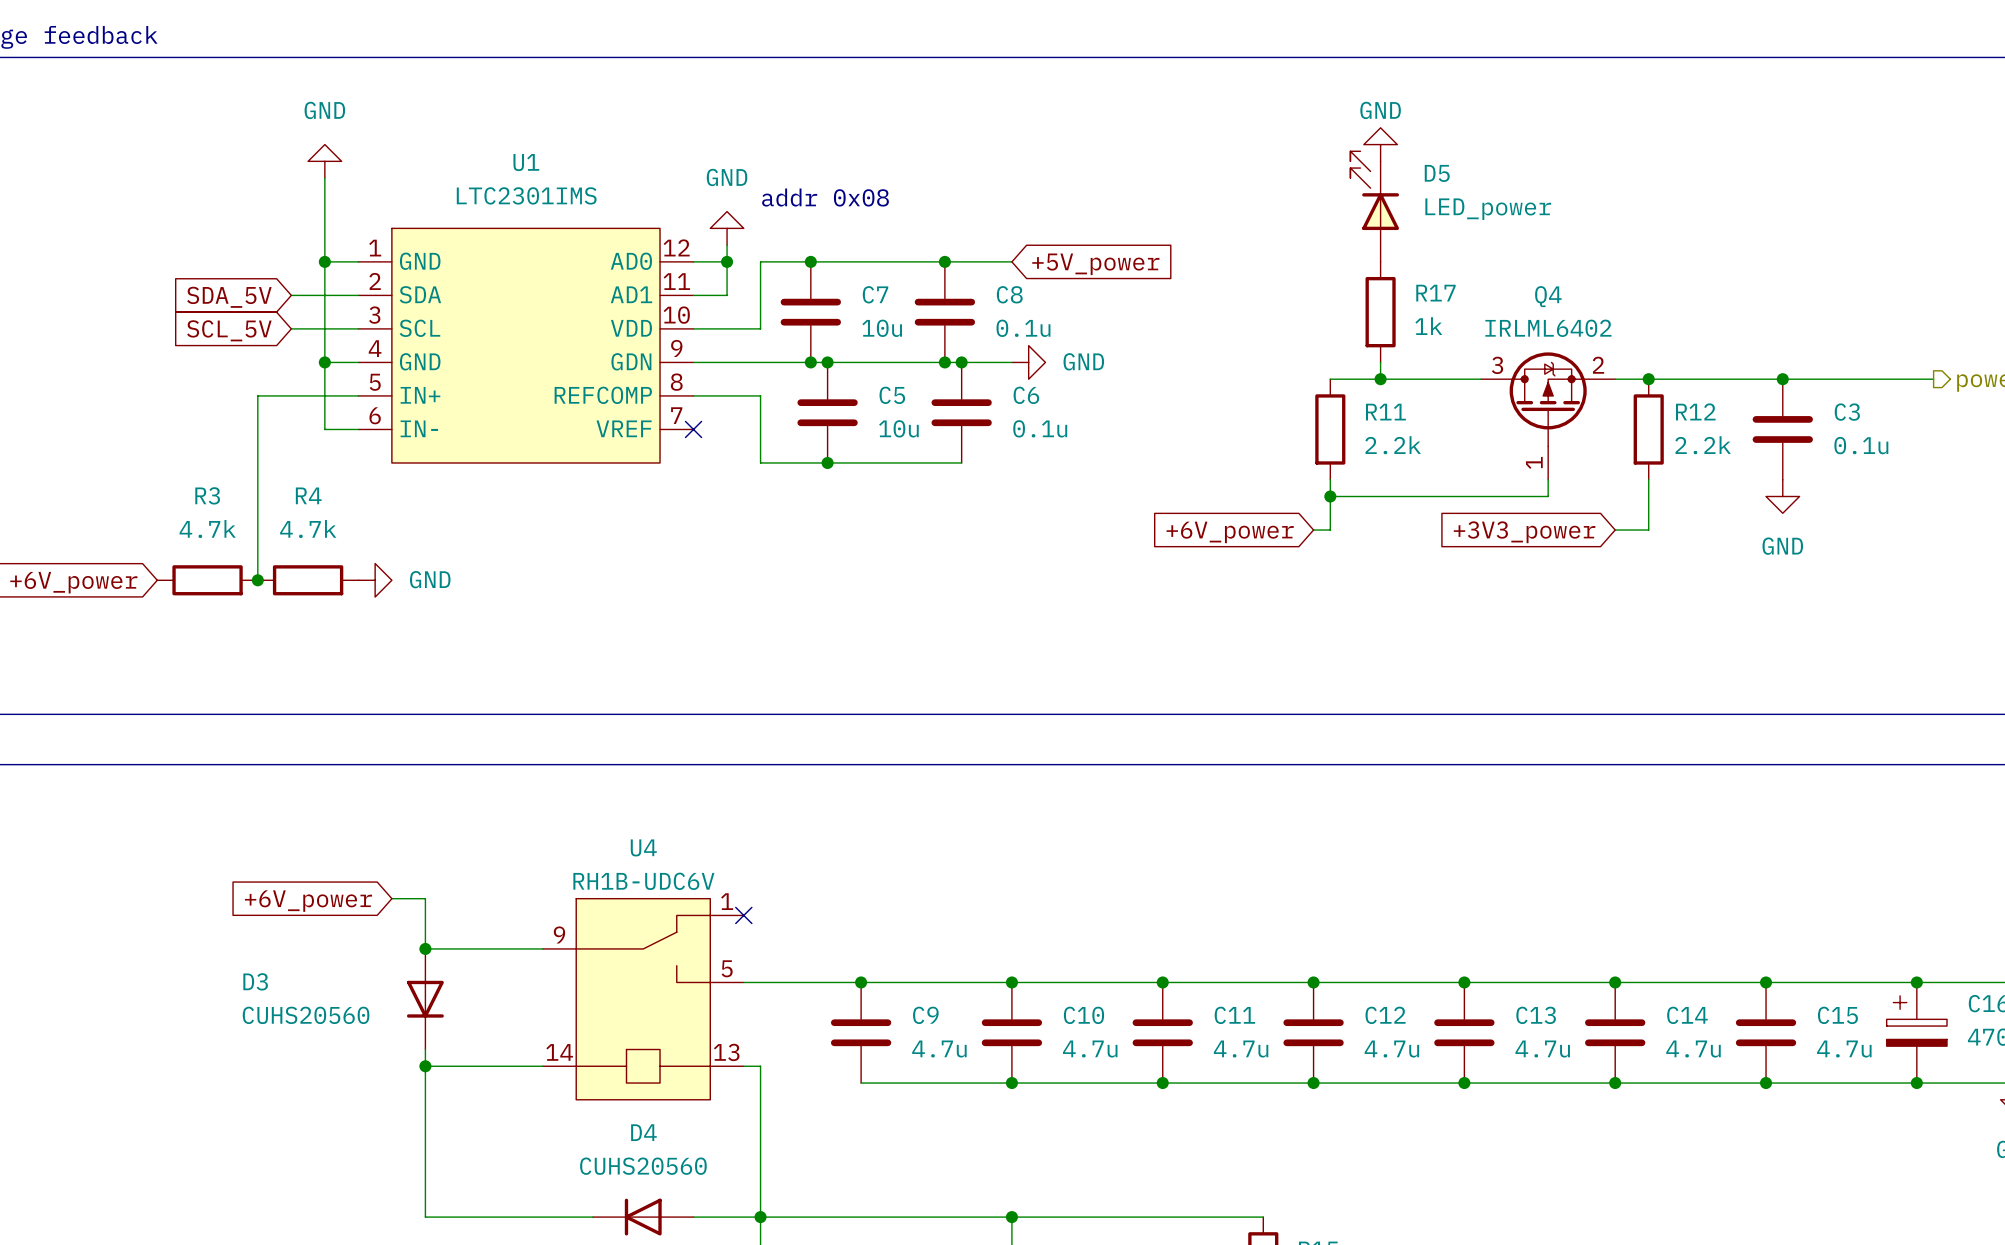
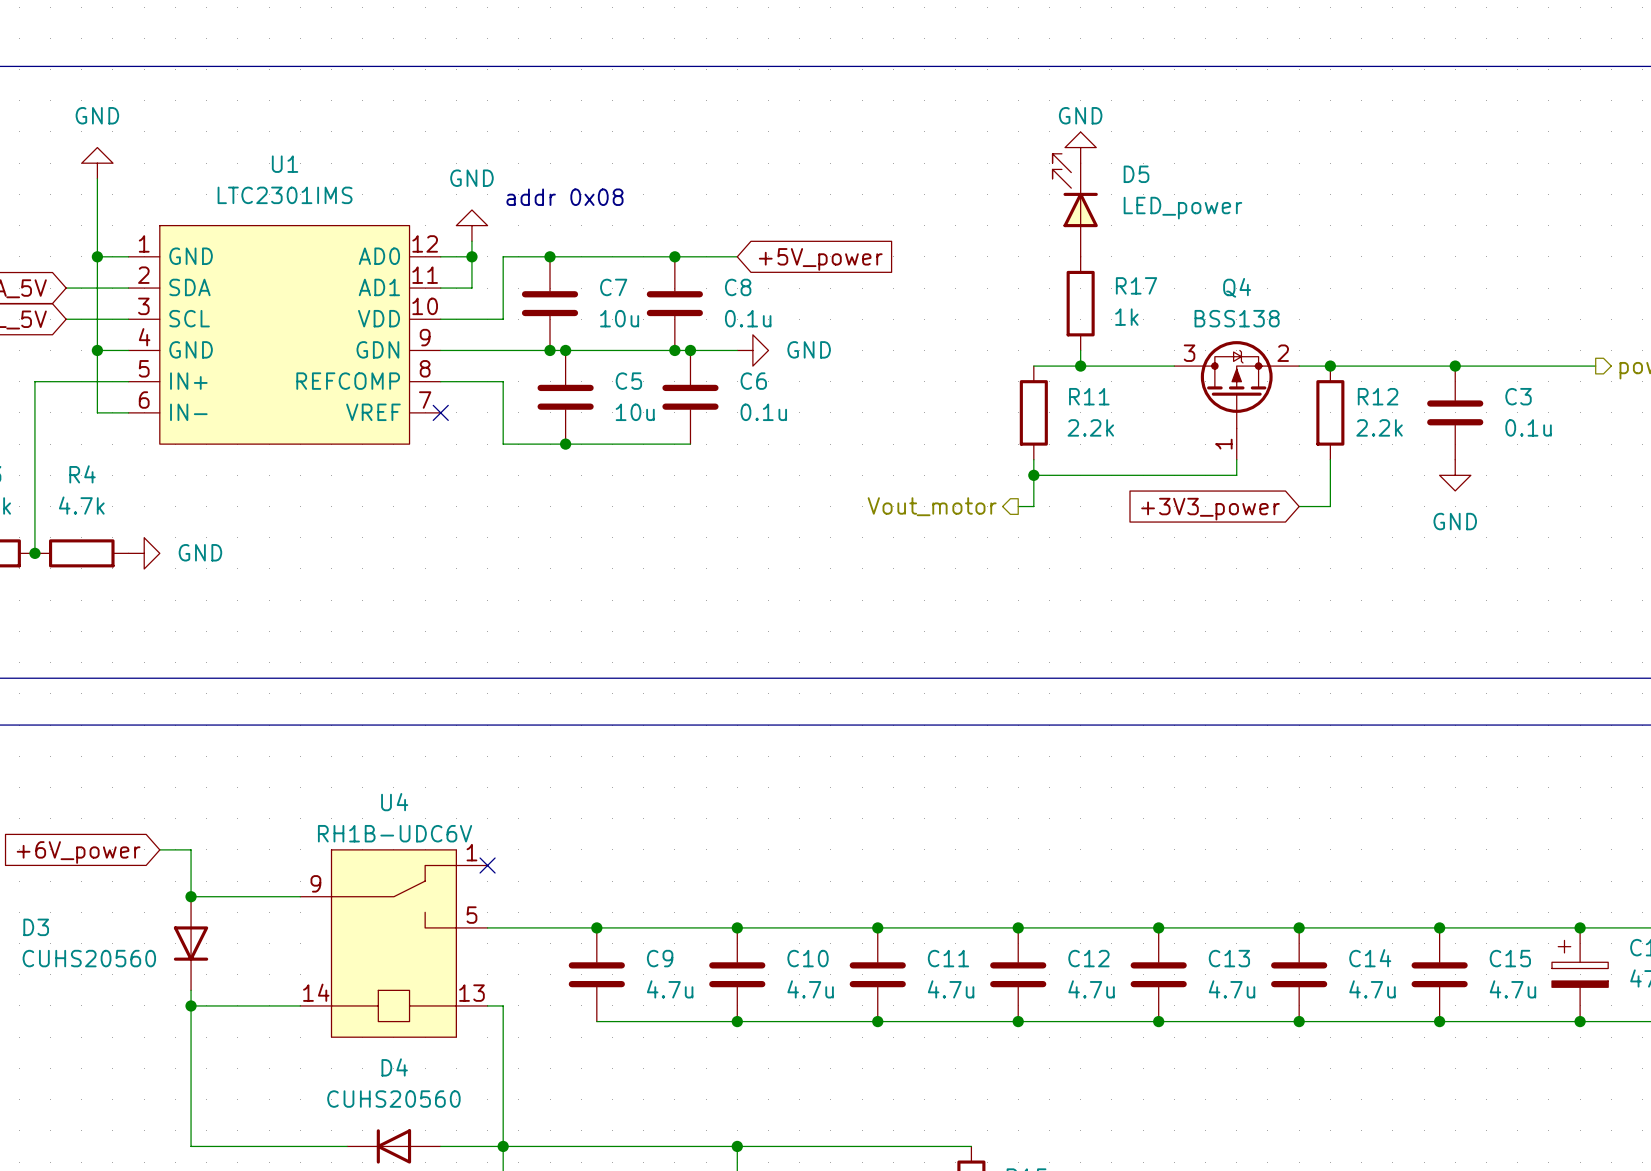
Q4 value: IRLML6402 (1548, 328) -> BSS138 (1237, 318)
hierarchical label: none -> Vout_motor (932, 506)
global label: +6V_power (1230, 532) -> none

